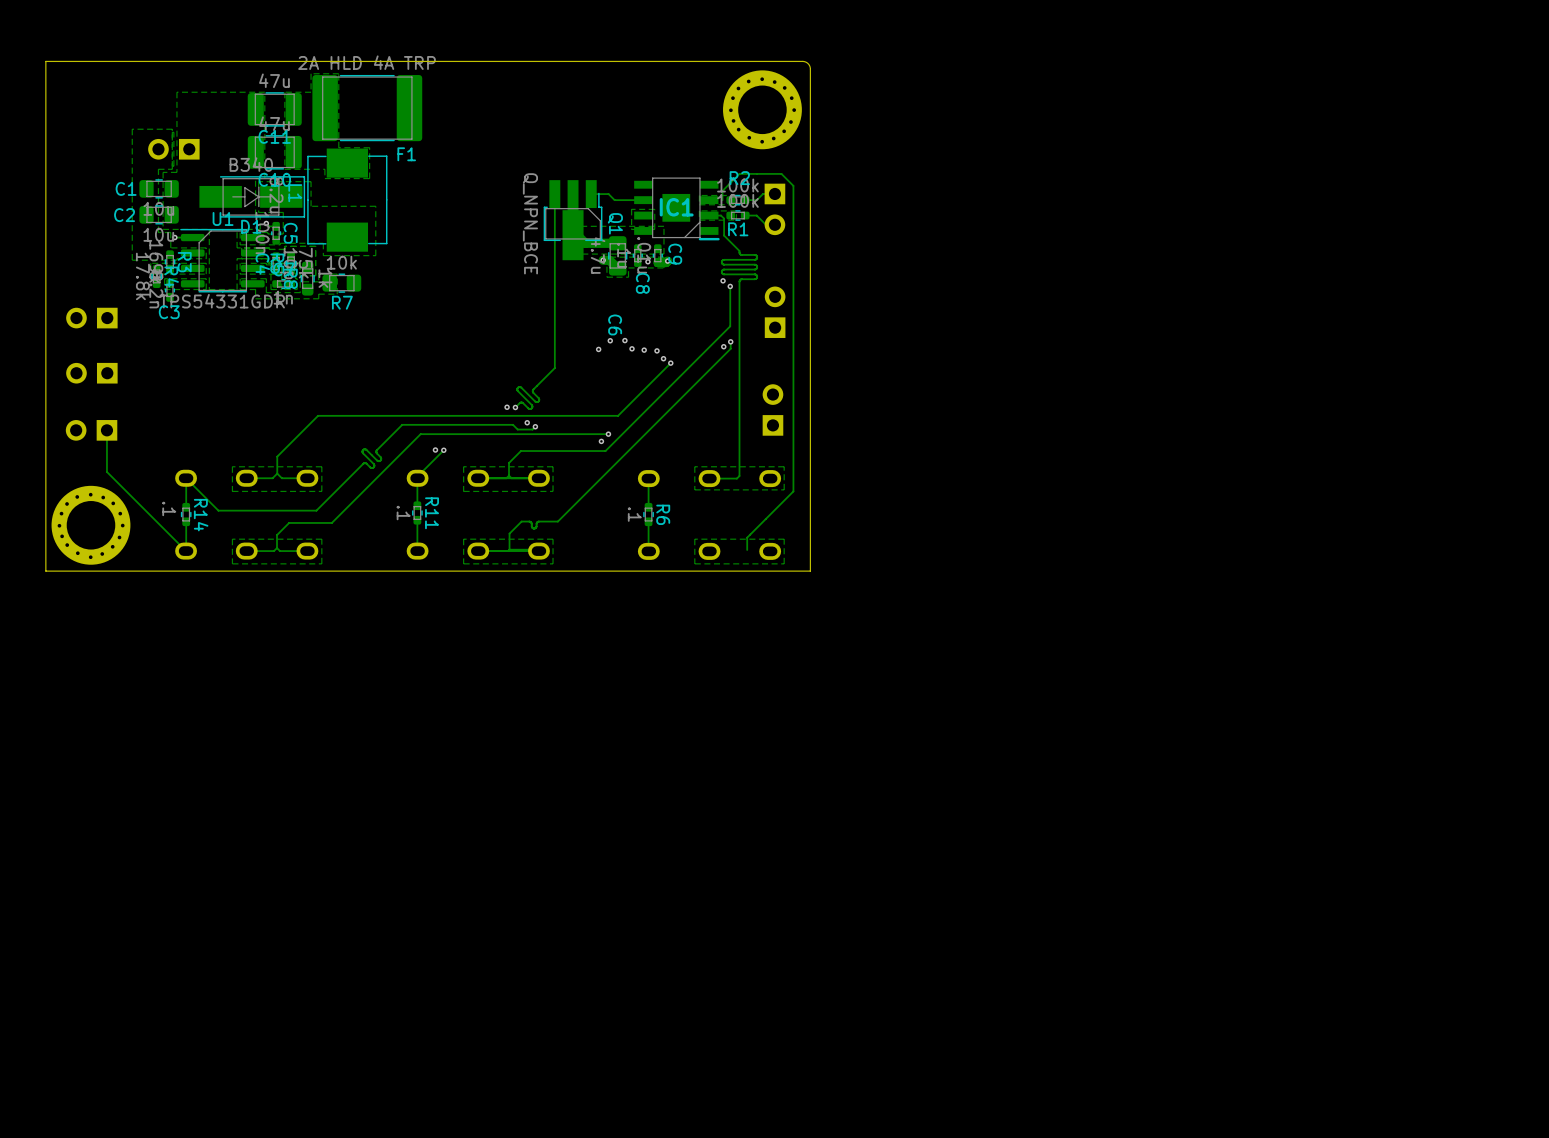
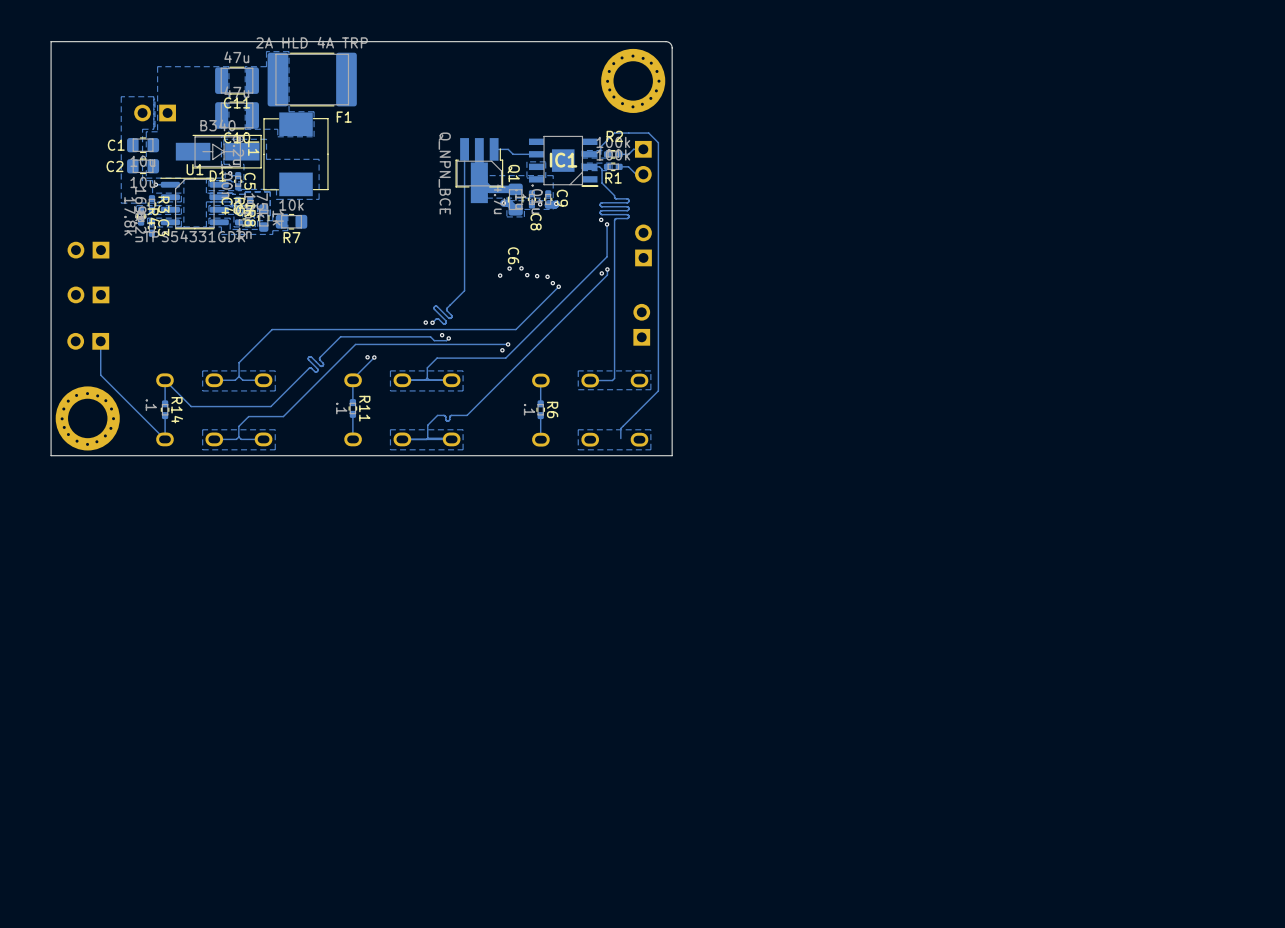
C3 name rotation: 0° (169, 312) -> 90° clockwise (163, 227)

